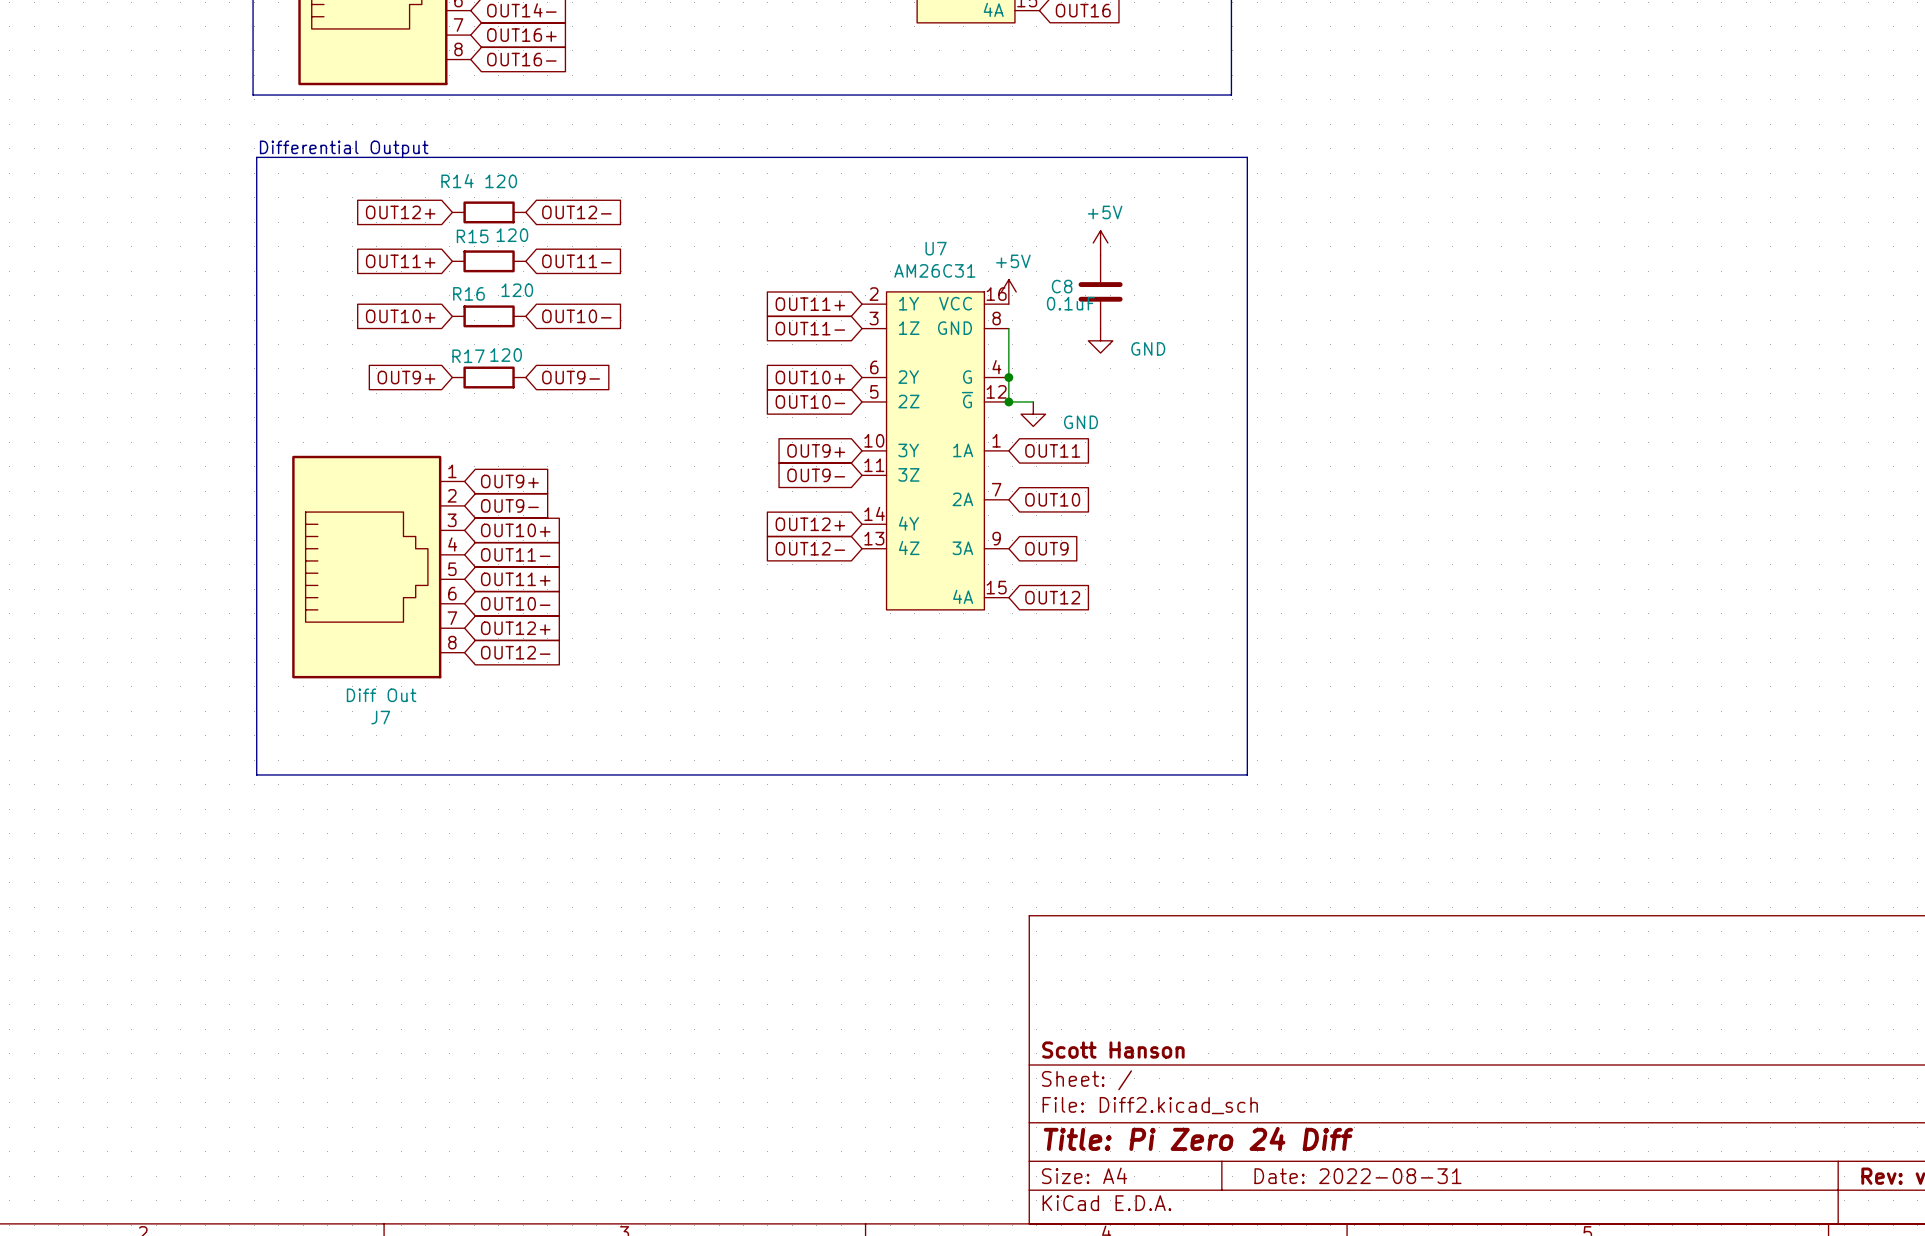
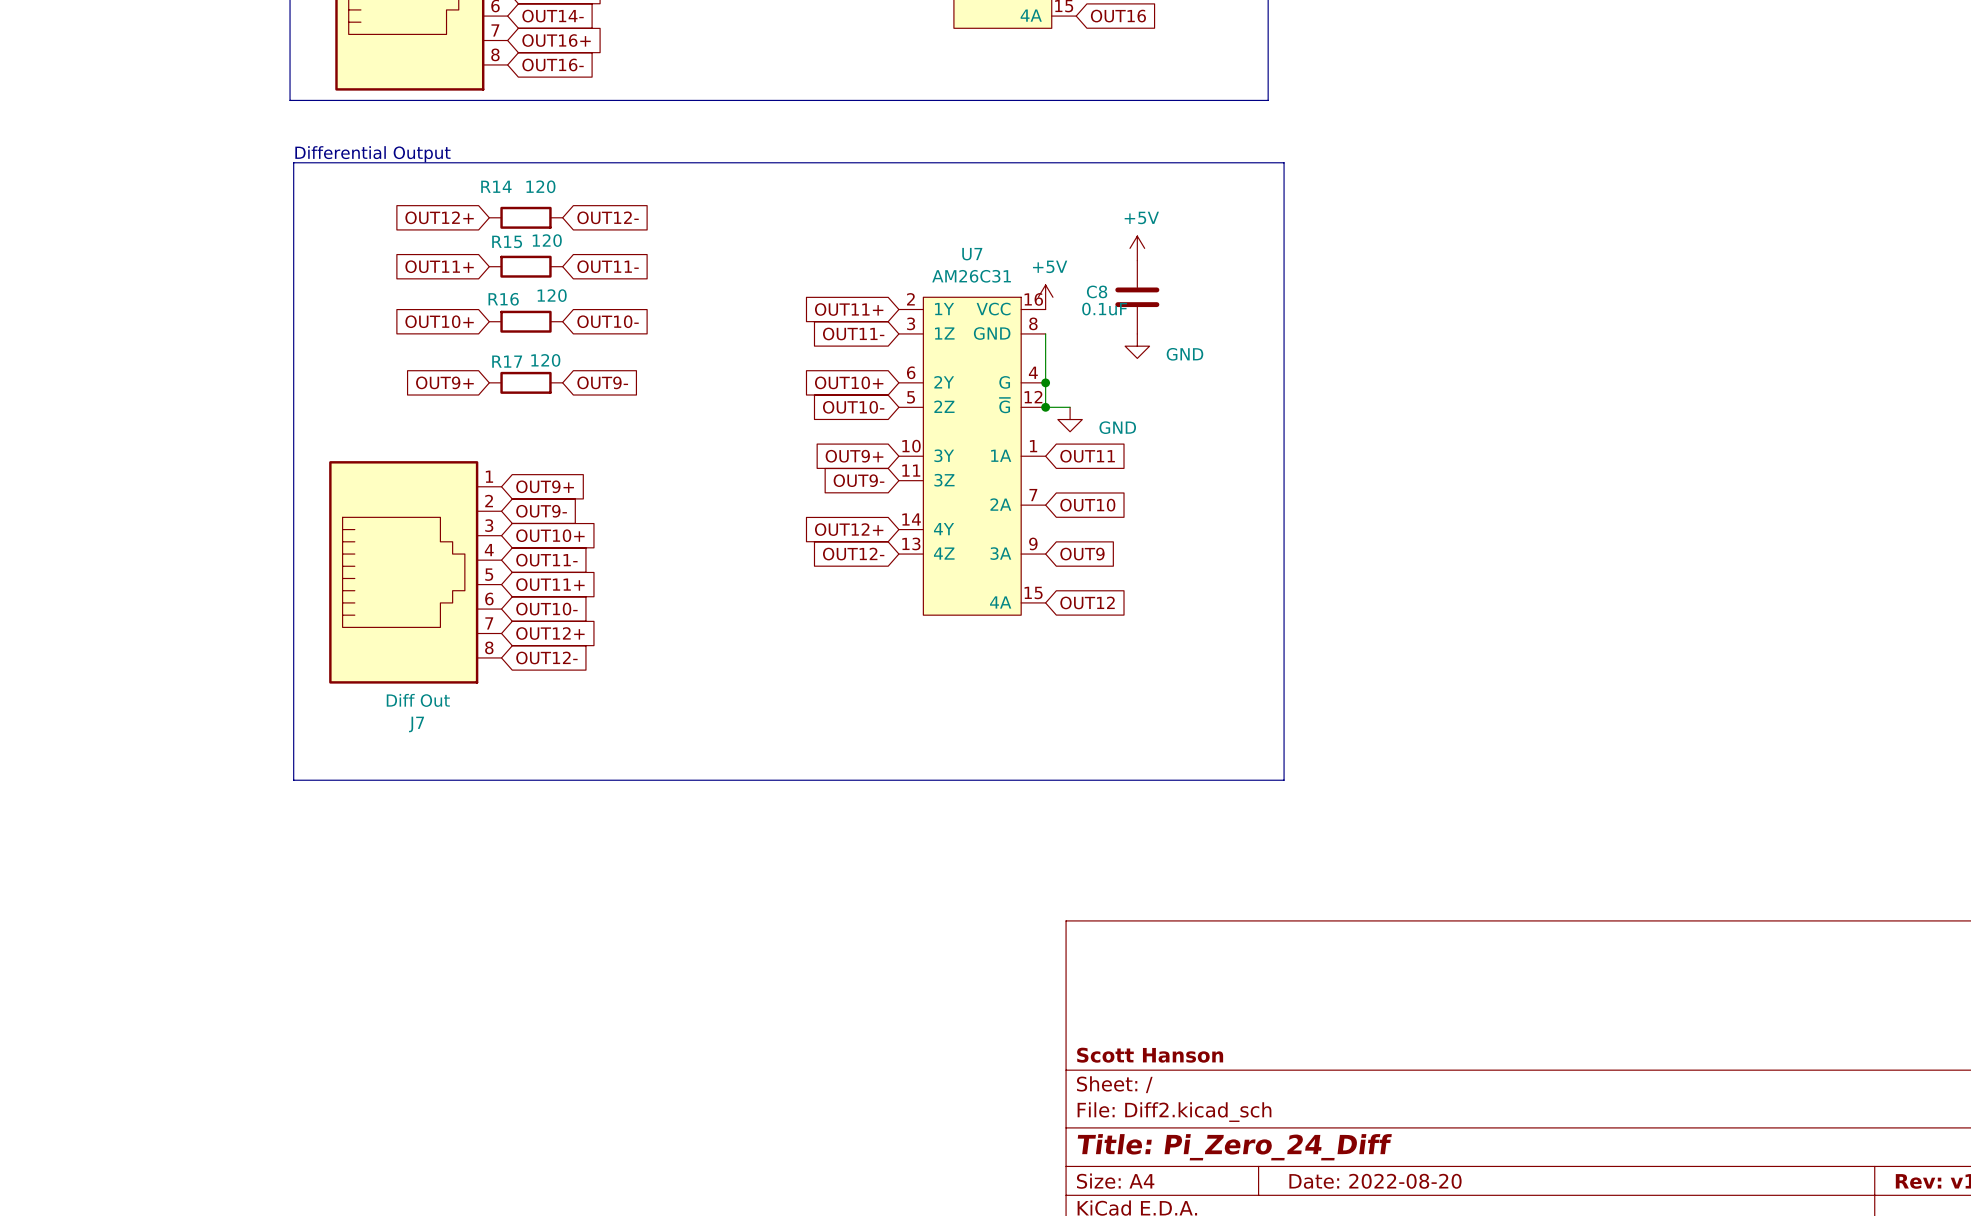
title block: Title: Pi Zero 24 Diff (1198, 1138) -> Title: Pi_Zero_24_Diff (1234, 1147)
title block: Date: 2022-08-31 (1357, 1176) -> Date: 2022-08-20 (1375, 1181)

